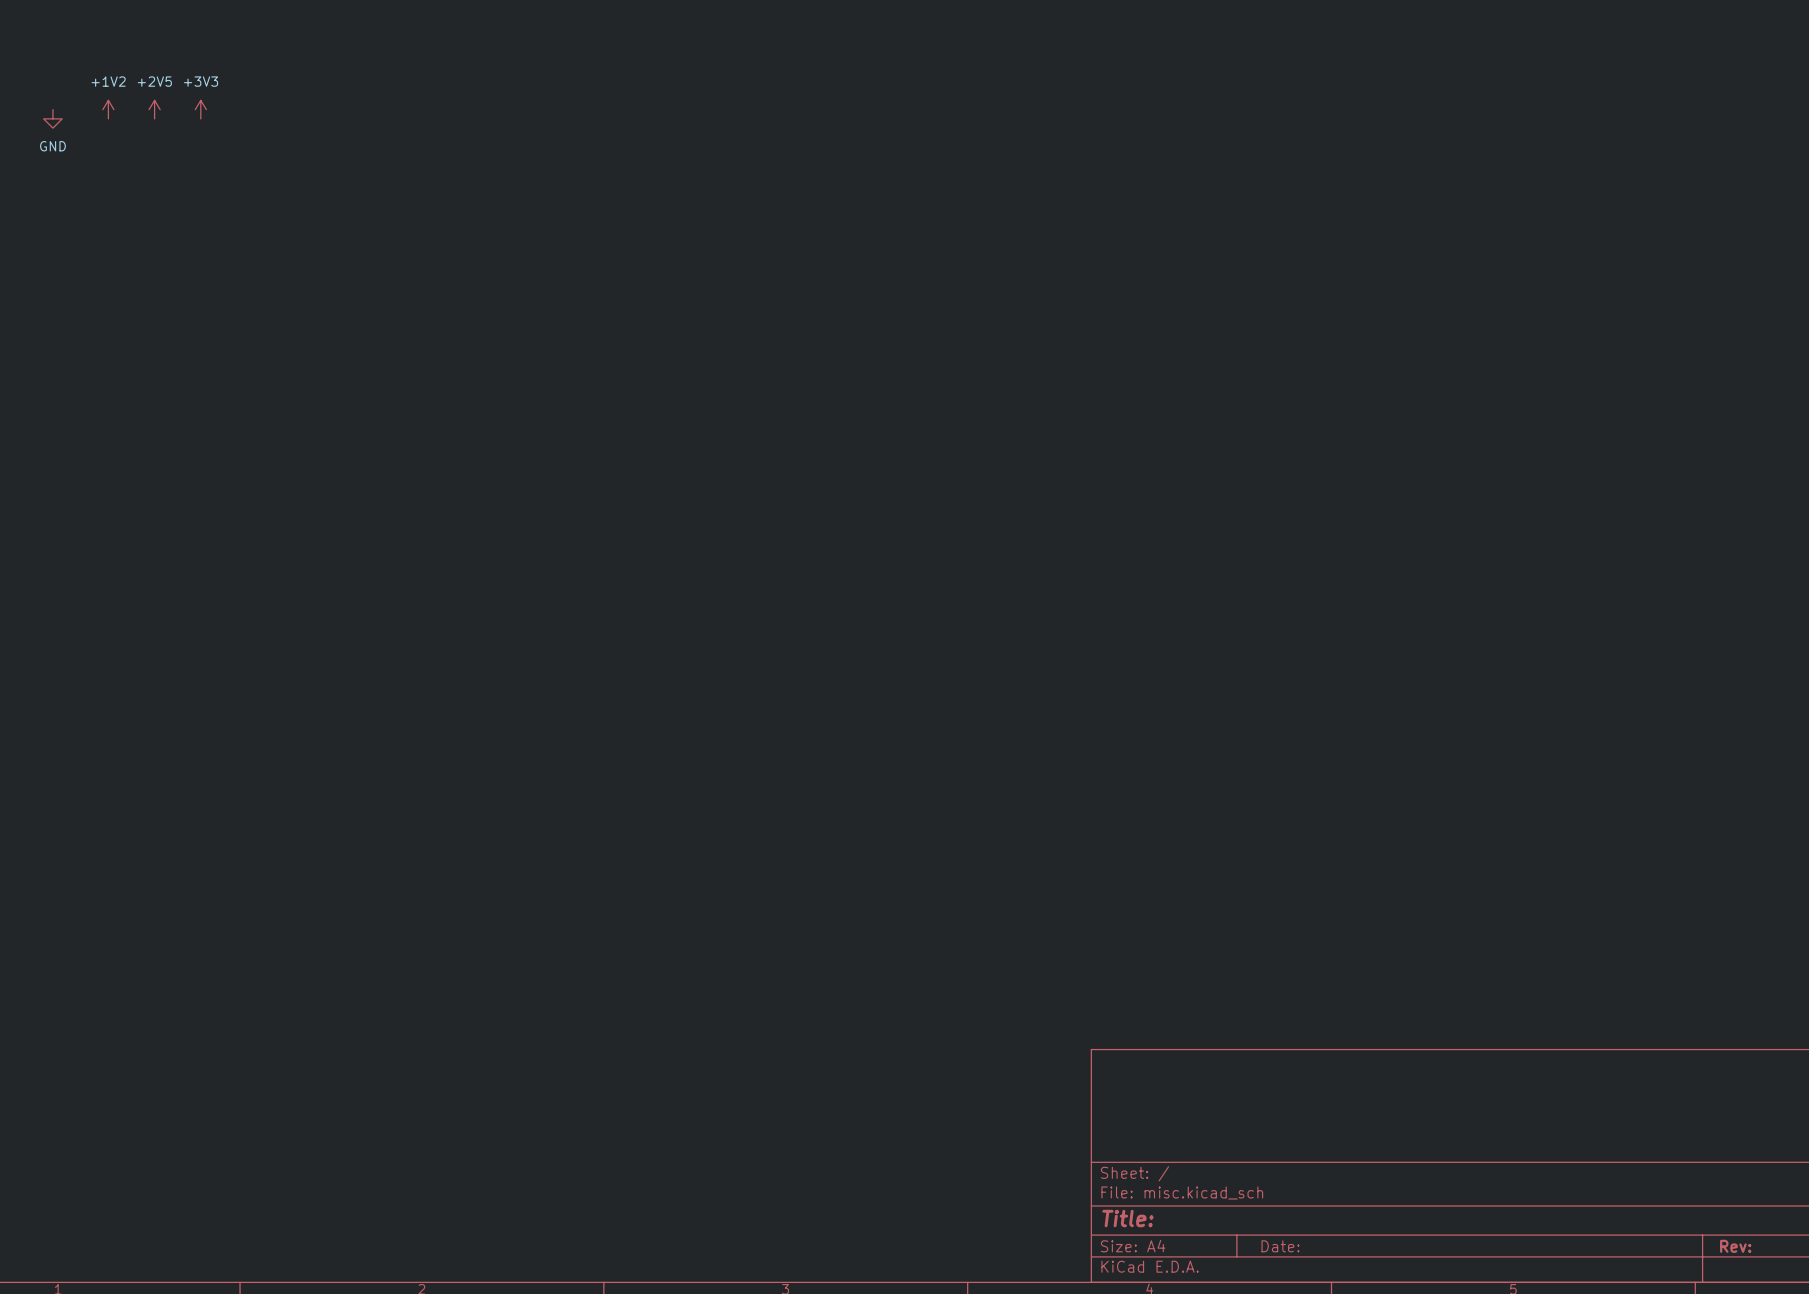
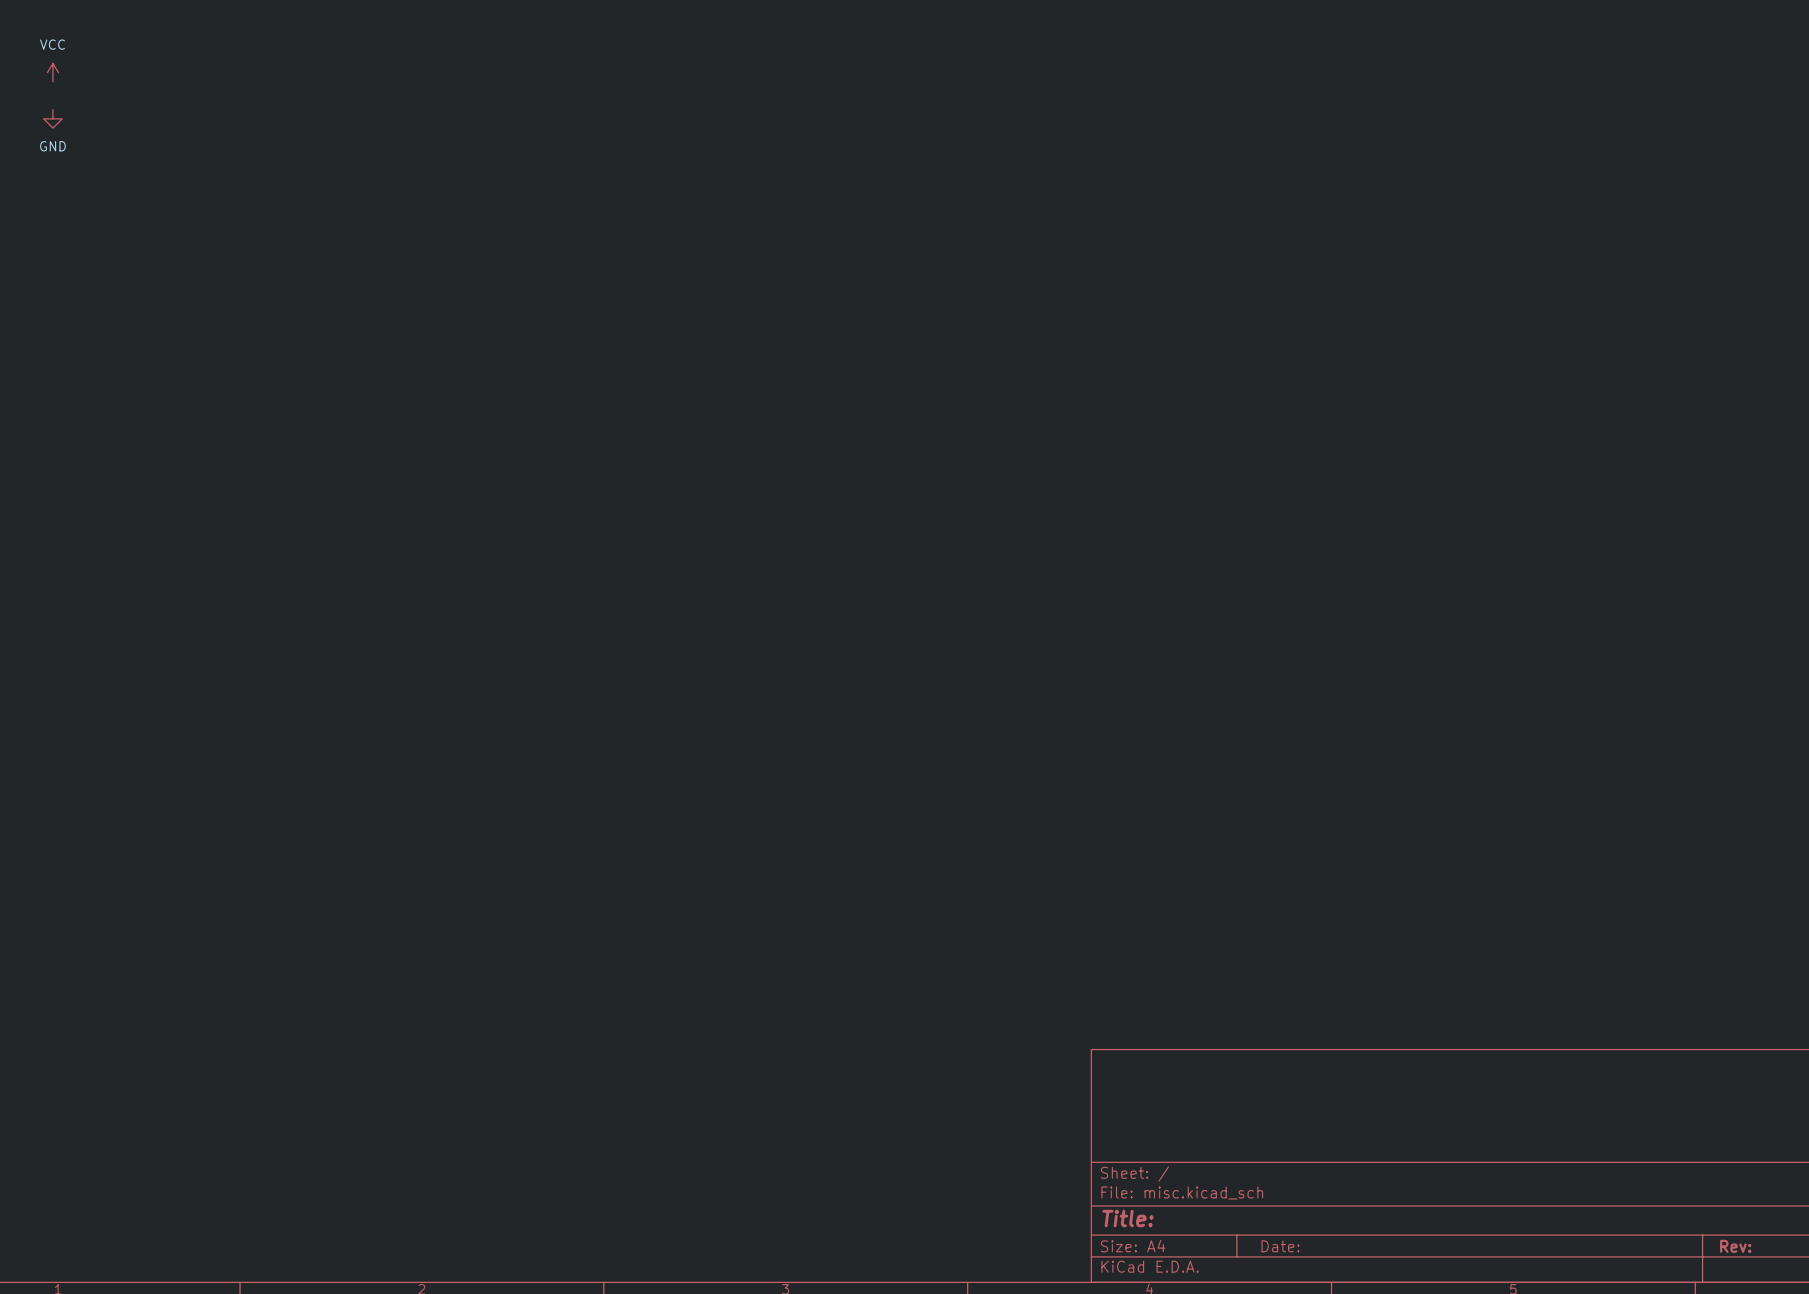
power symbol: none -> VCC (52, 72)
power symbol: +1V2 (108, 109) -> none
power symbol: +2V5 (154, 109) -> none
power symbol: +3V3 (200, 109) -> none

